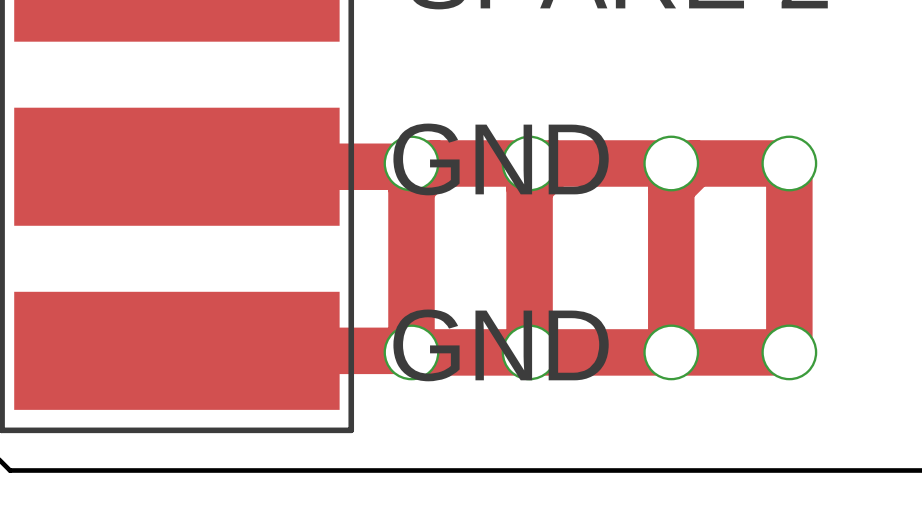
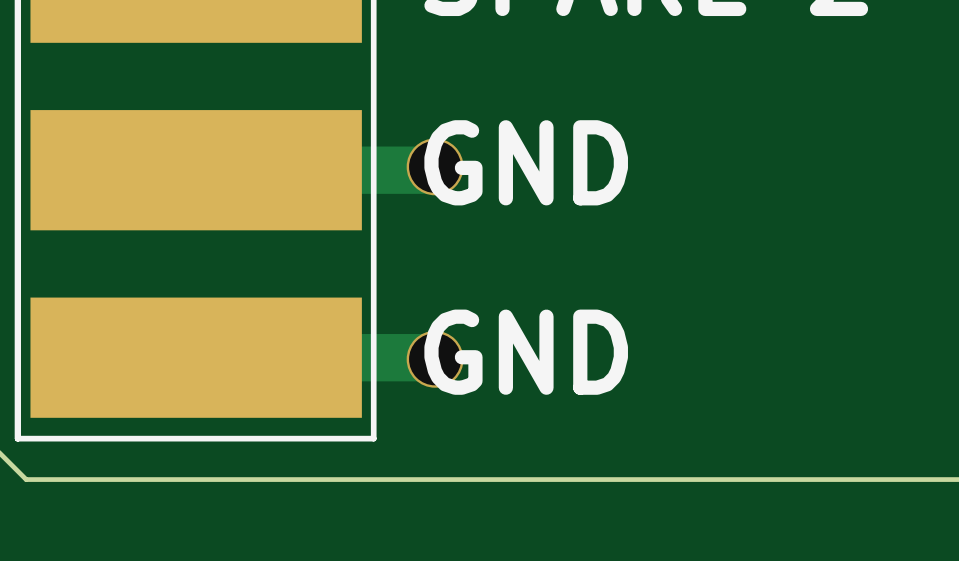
track: (411, 163) (789, 163) (789, 352) (411, 352) (411, 187) (435, 163) -> none
via: (529, 163) -> none
track: (553, 163) (529, 187) (529, 352) -> none
via: (671, 163) -> none
track: (694, 163) (671, 187) (671, 352) -> none
via: (789, 163) -> none
via: (529, 352) -> none
via: (671, 352) -> none
via: (789, 352) -> none

